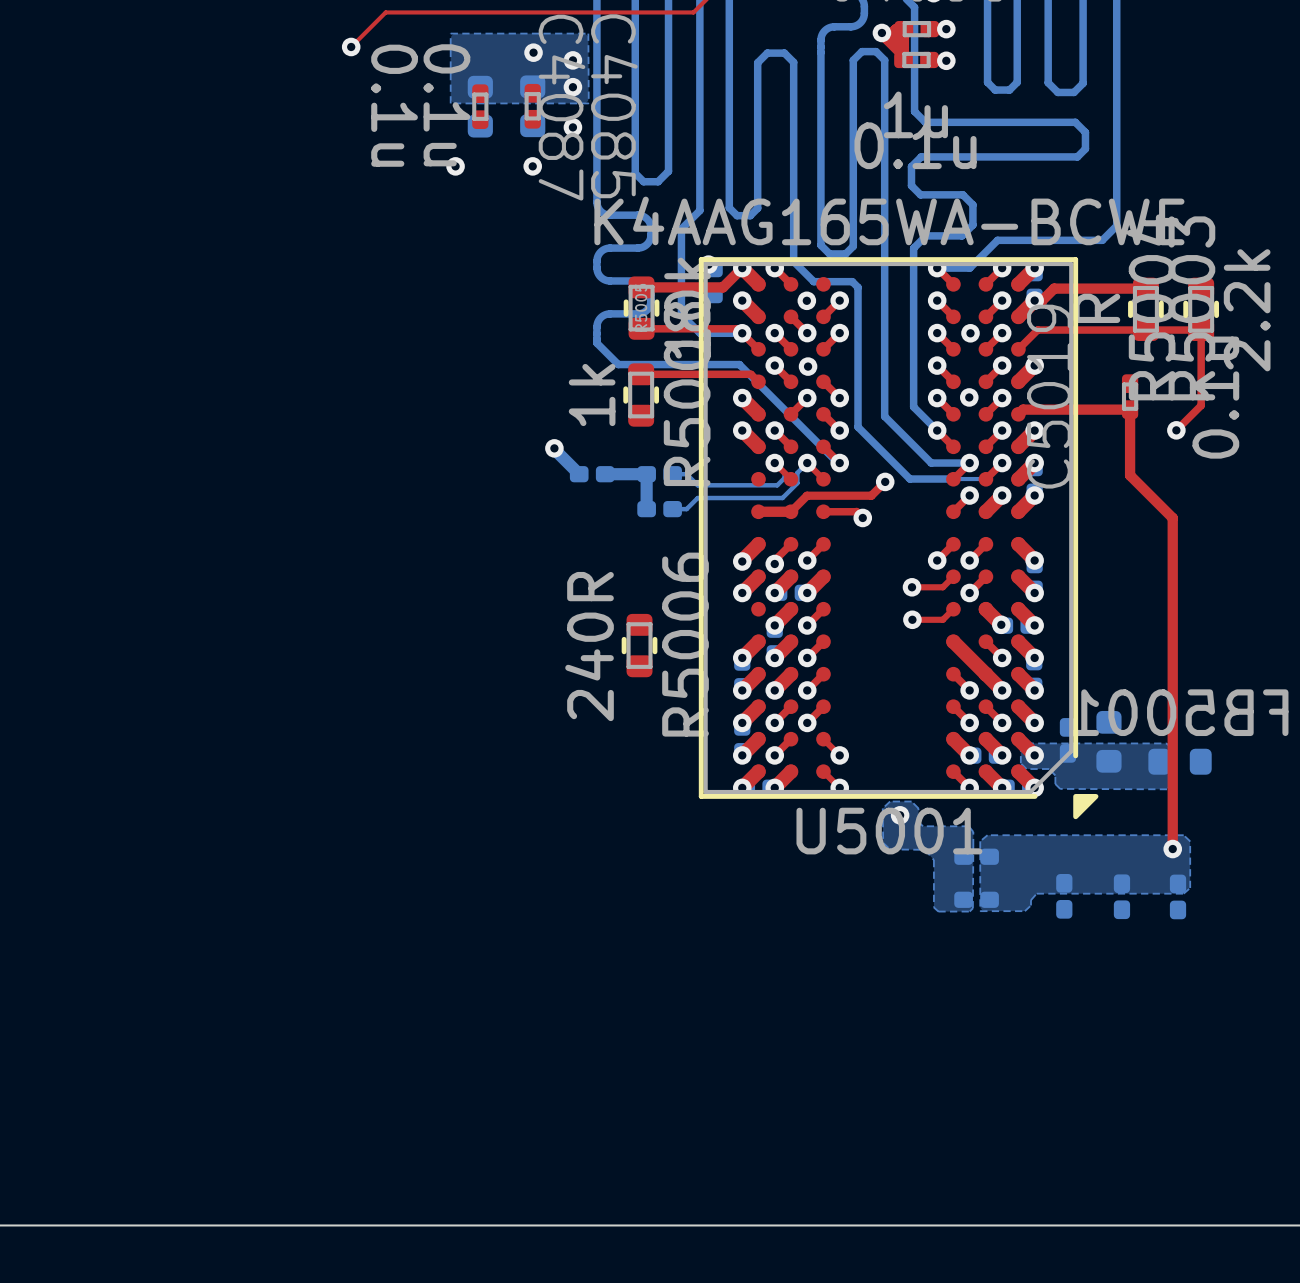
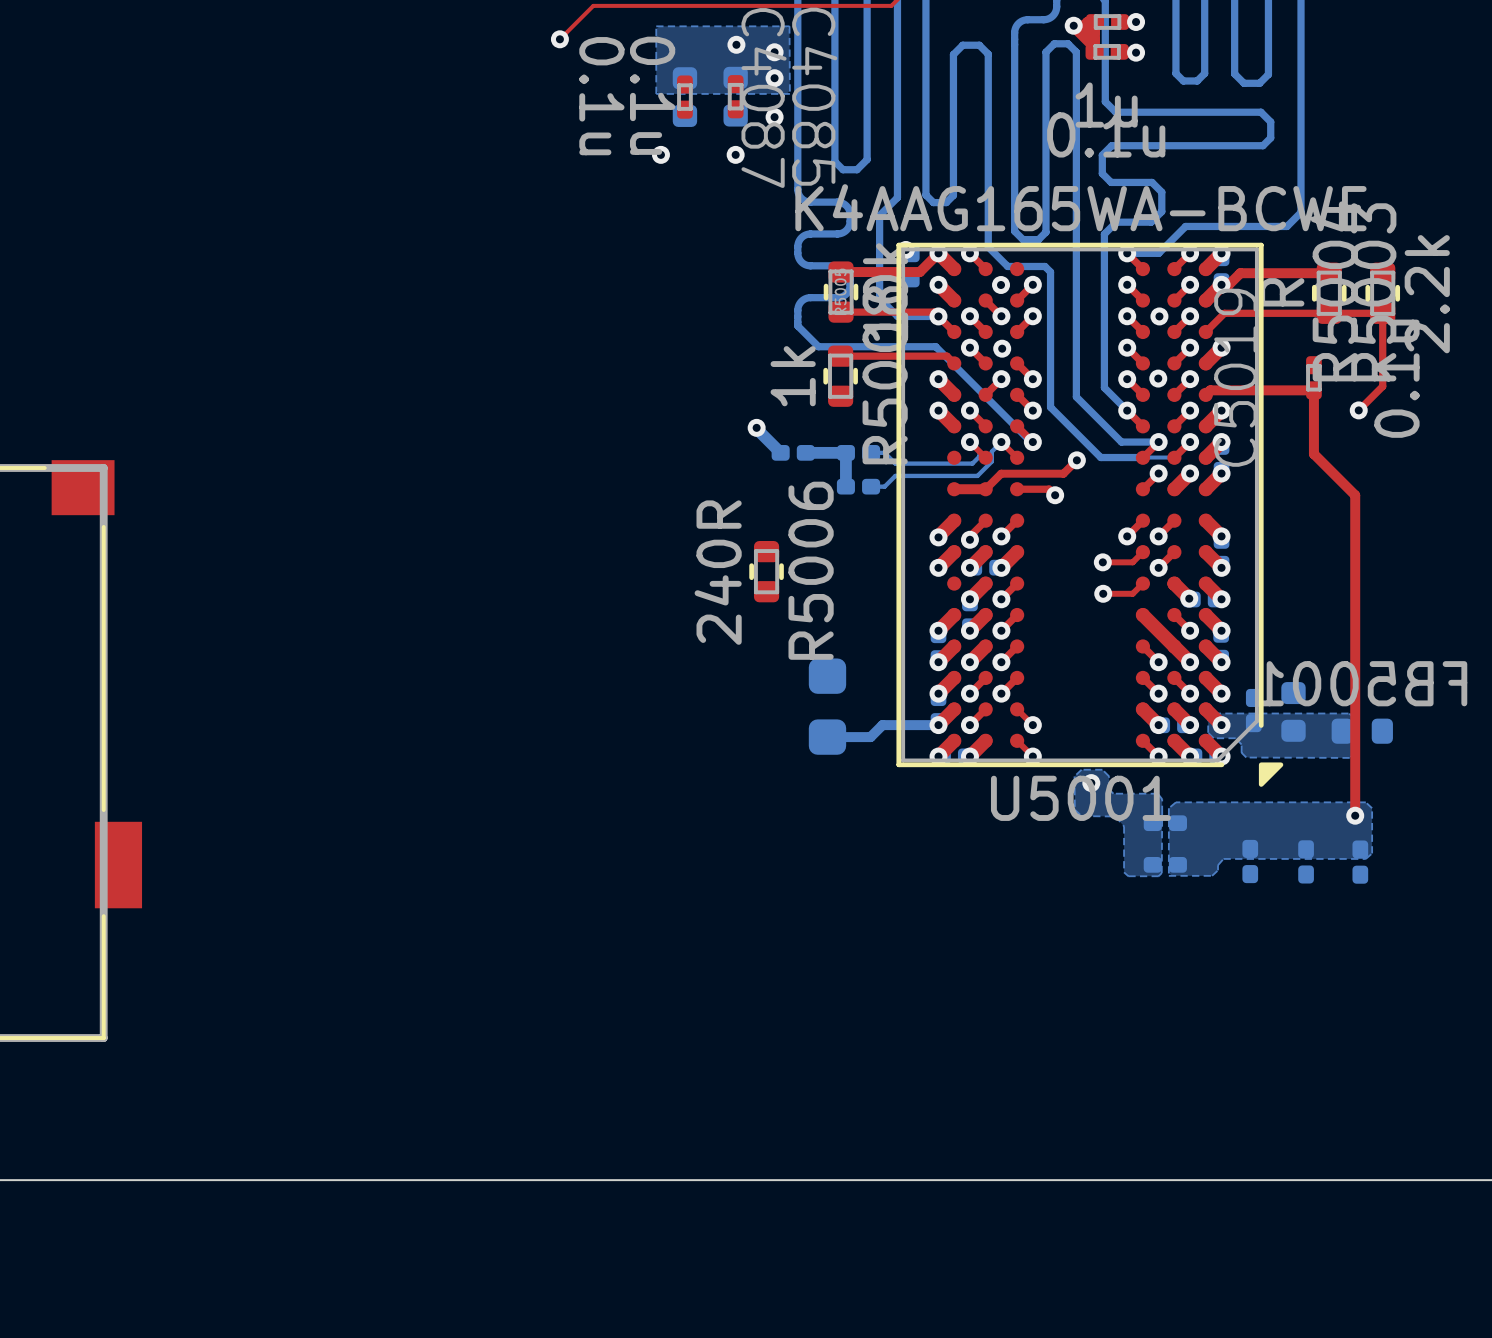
R5006 position: (639, 645) -> (766, 571)
part: none -> (827, 706)
bottom track: none -> (938, 725) (882, 725) (870, 737) (827, 737)

